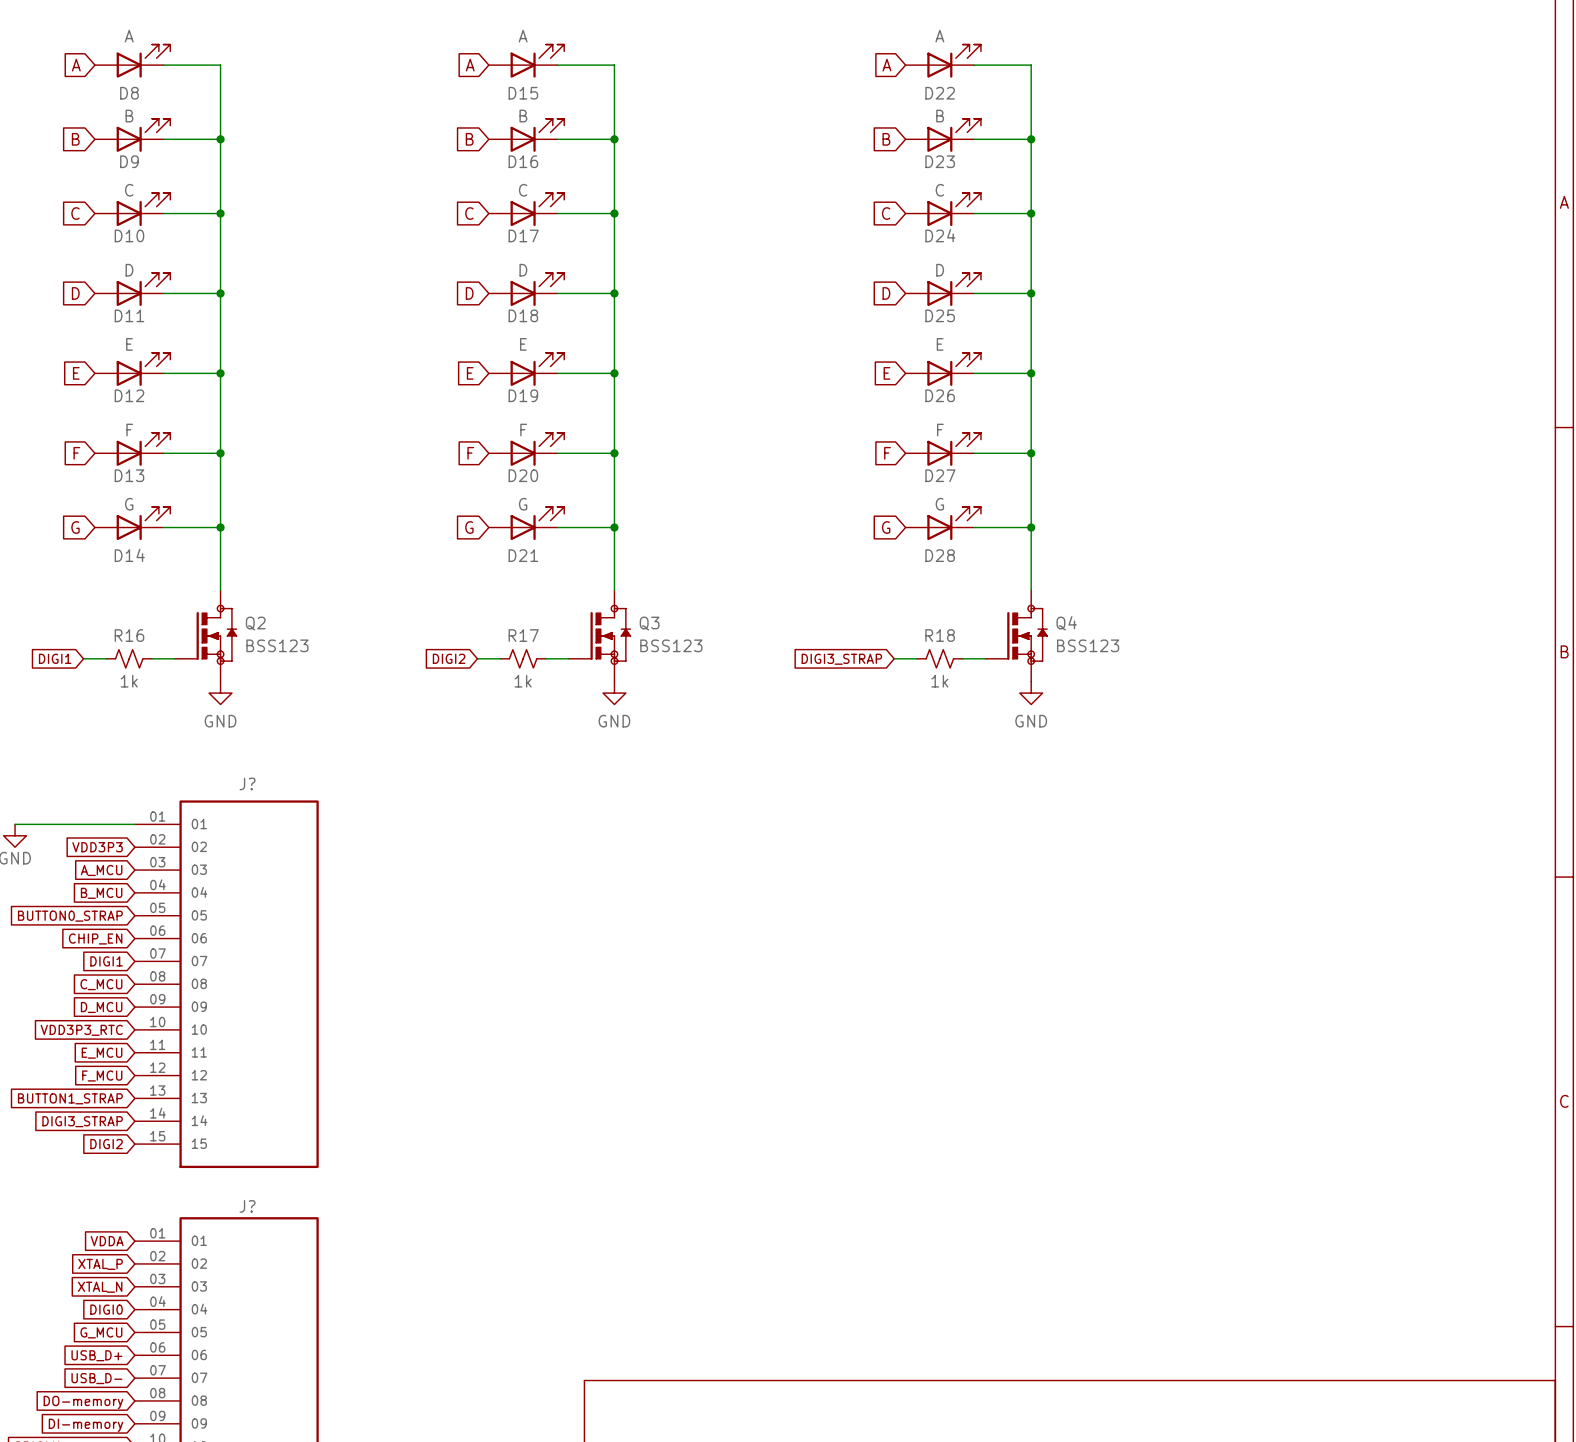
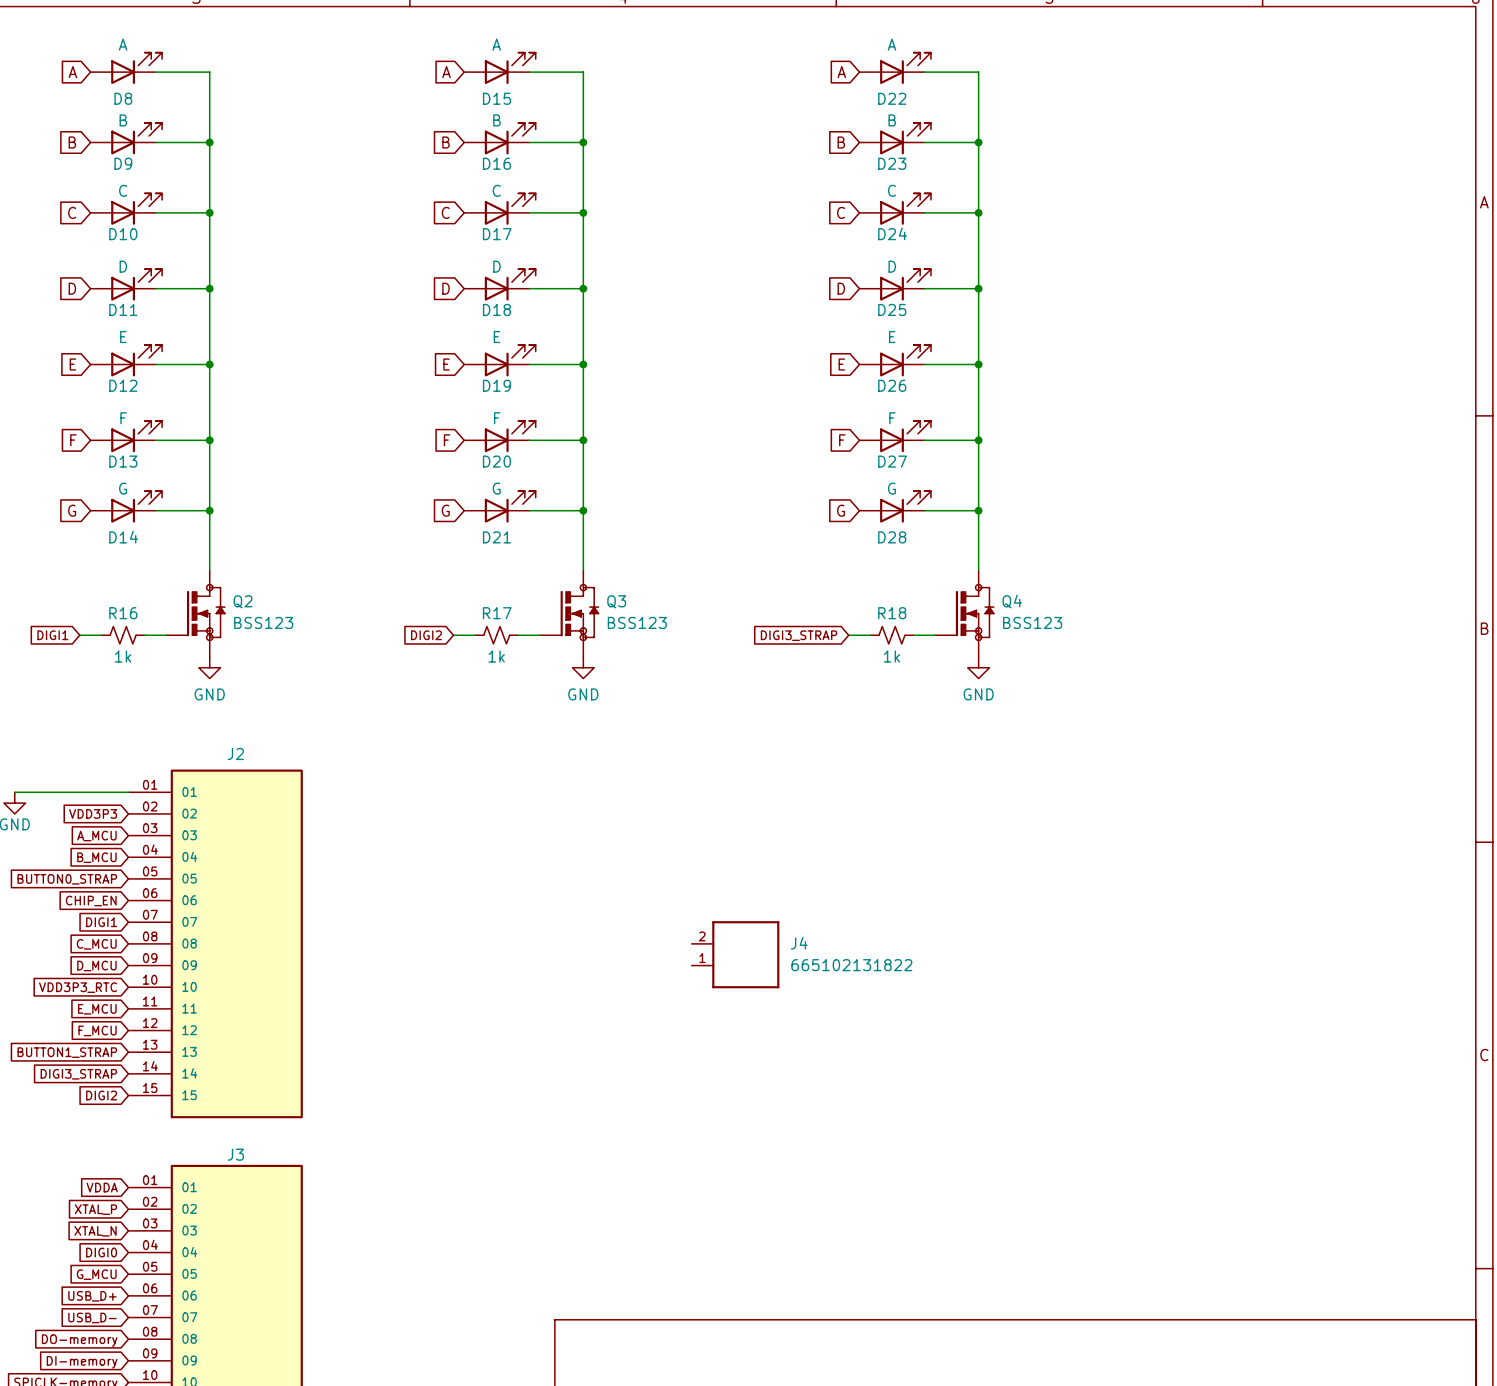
J? name: J? (247, 783) -> J2 (235, 753)
J4: none -> 665102131822 (735, 954)
J? name: J? (247, 1206) -> J3 (235, 1154)

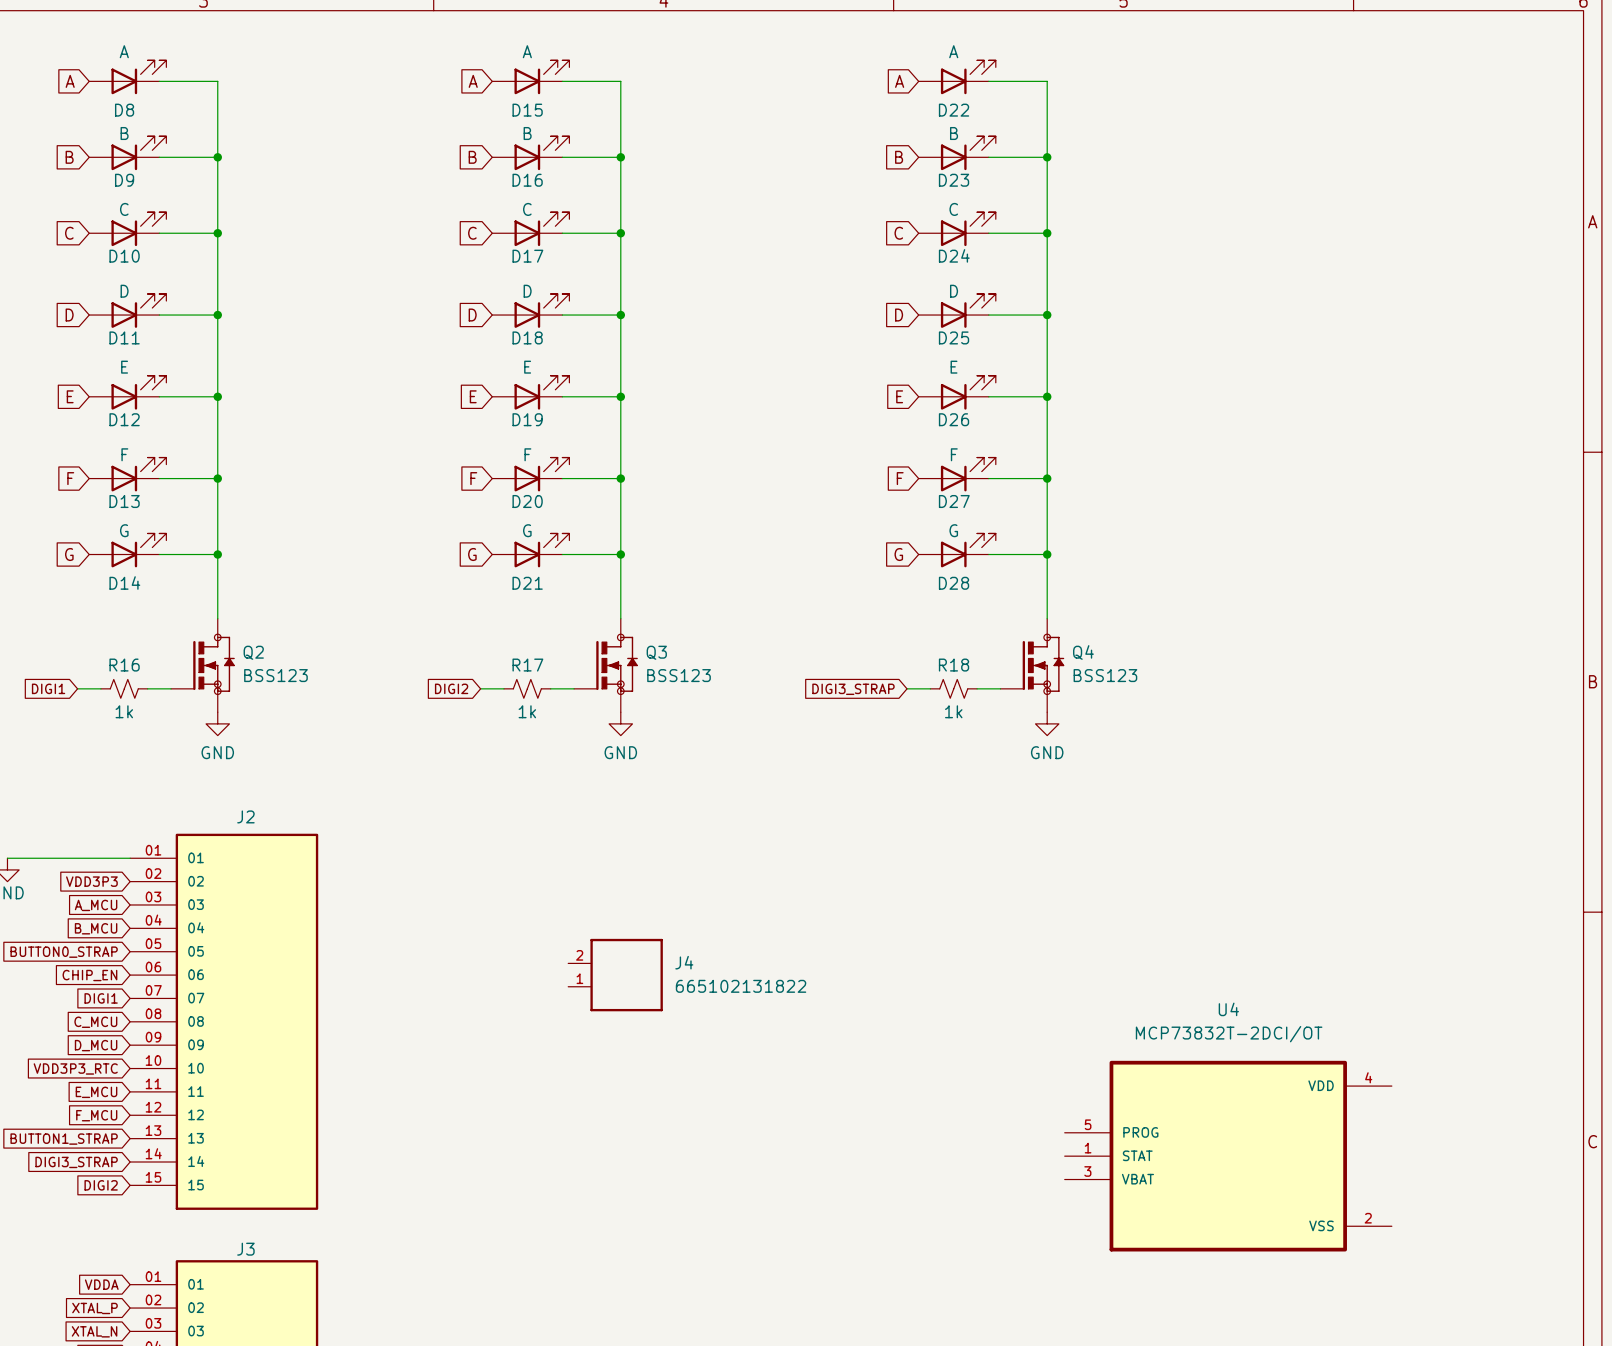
J4 position: (735, 954) -> (615, 975)
U4: none -> MCP73832T-2DCI/OT (1228, 1156)

